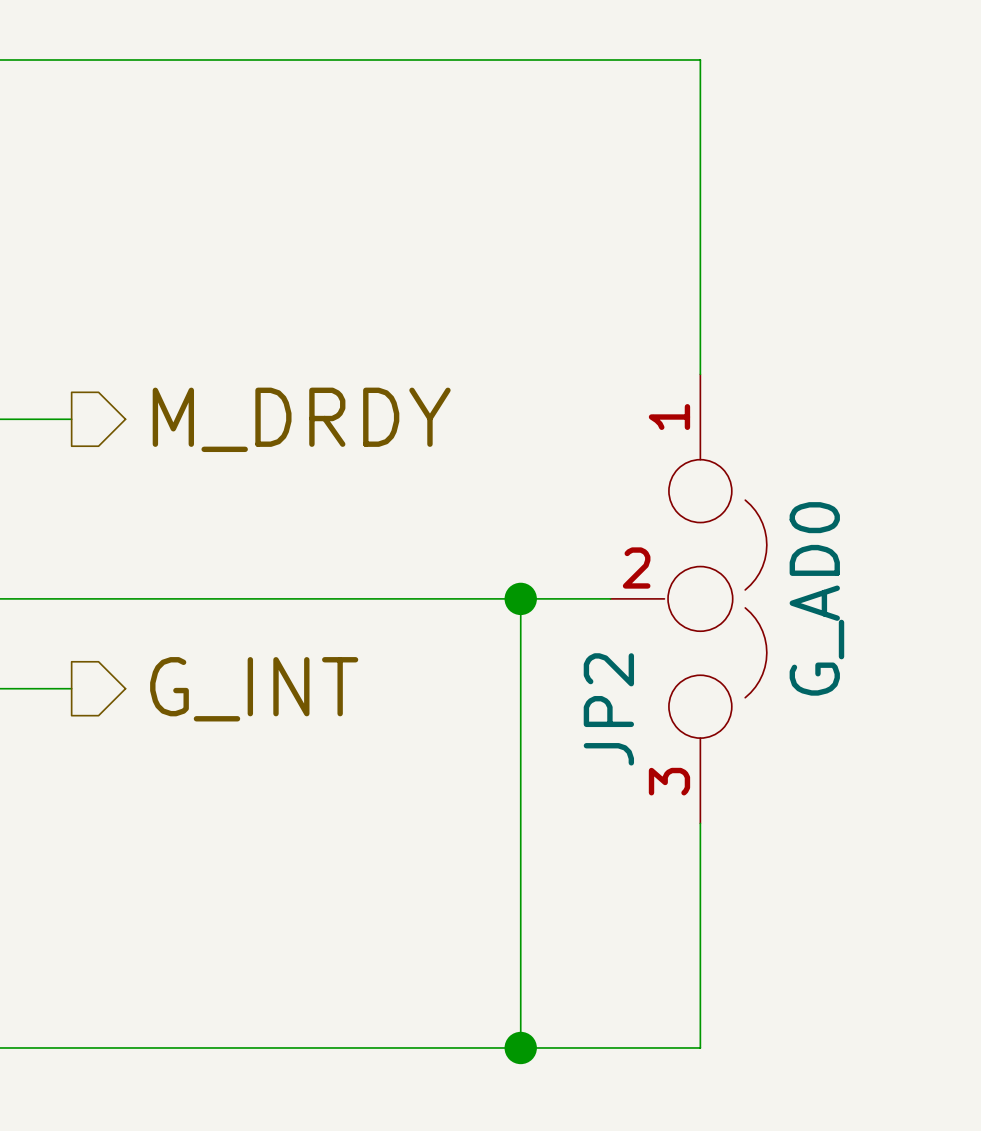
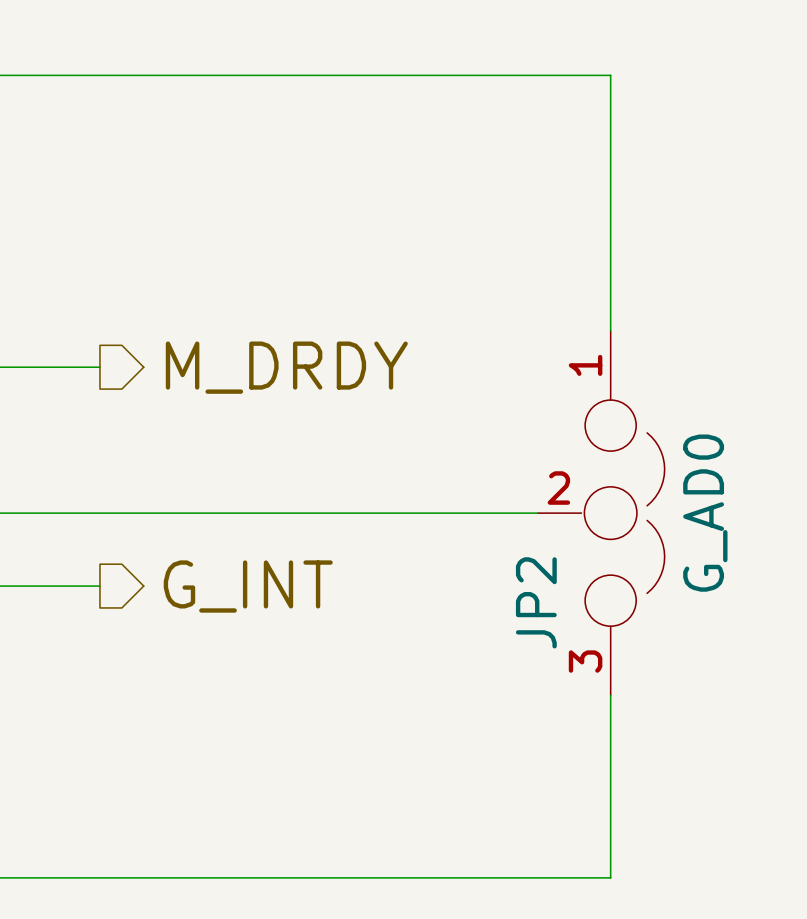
wire: (520, 598) (520, 1047) -> none
junction: (520, 598) -> none
junction: (520, 1047) -> none

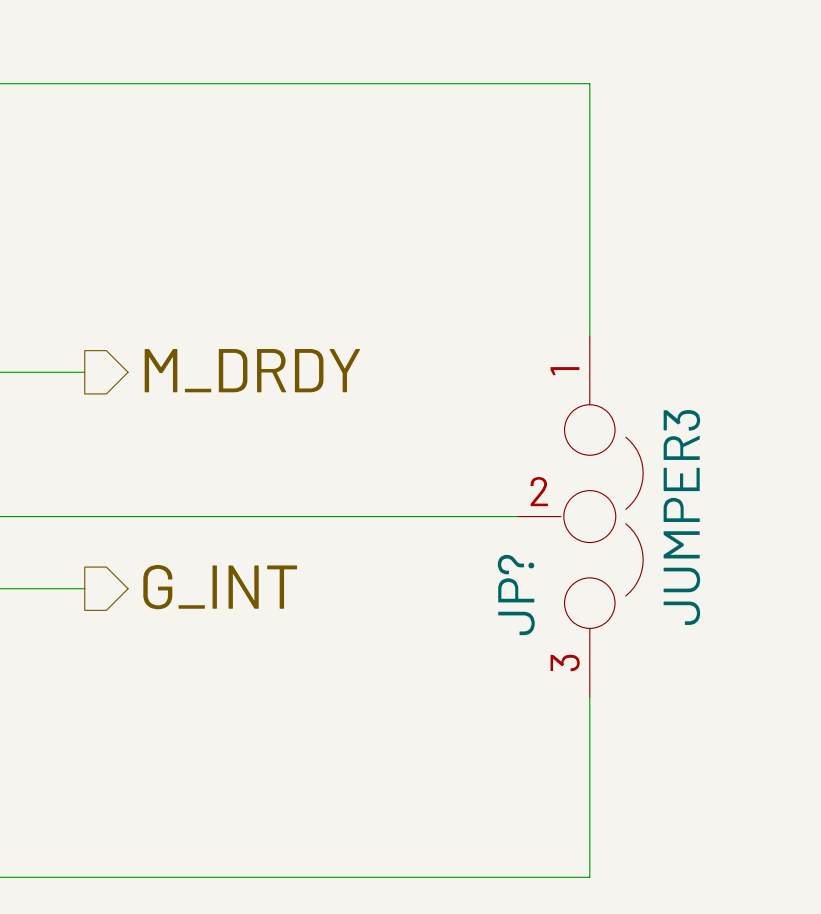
JP2 value: G_AD0 (705, 513) -> JUMPER3 (681, 517)
JP2 name: JP2 (536, 602) -> JP? (516, 595)

